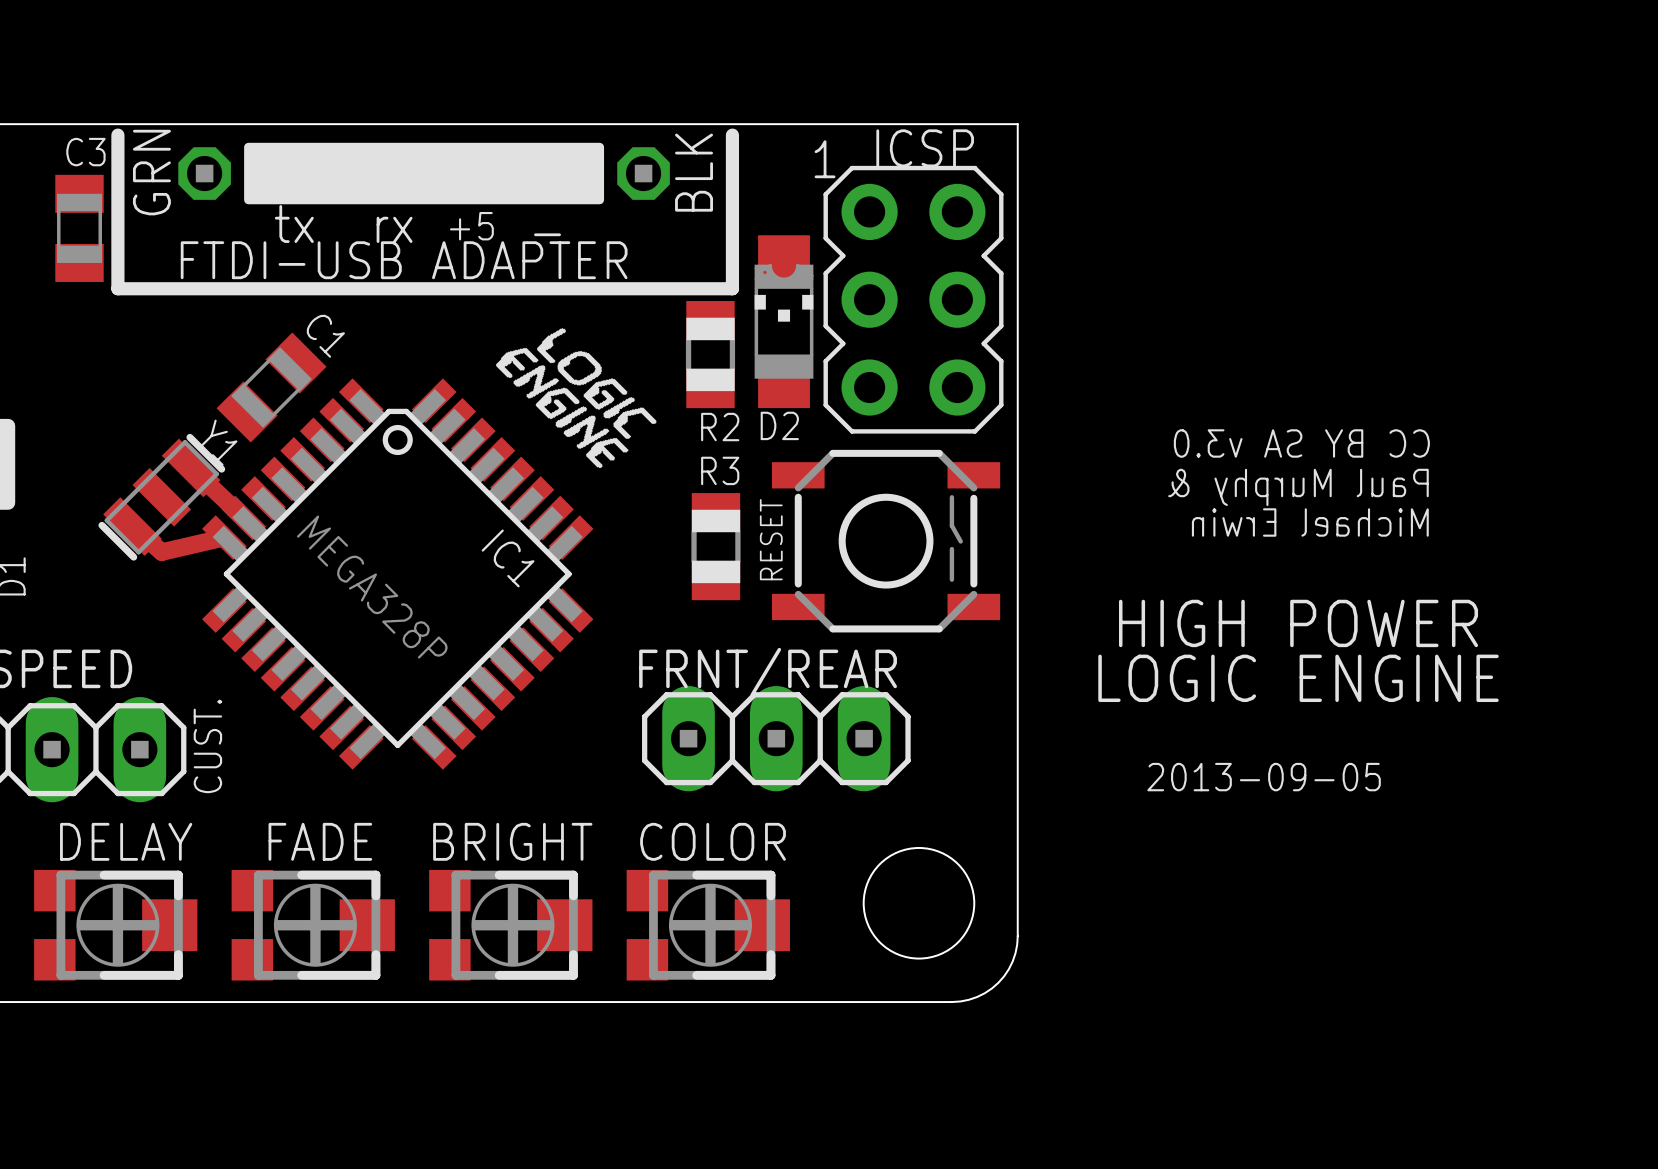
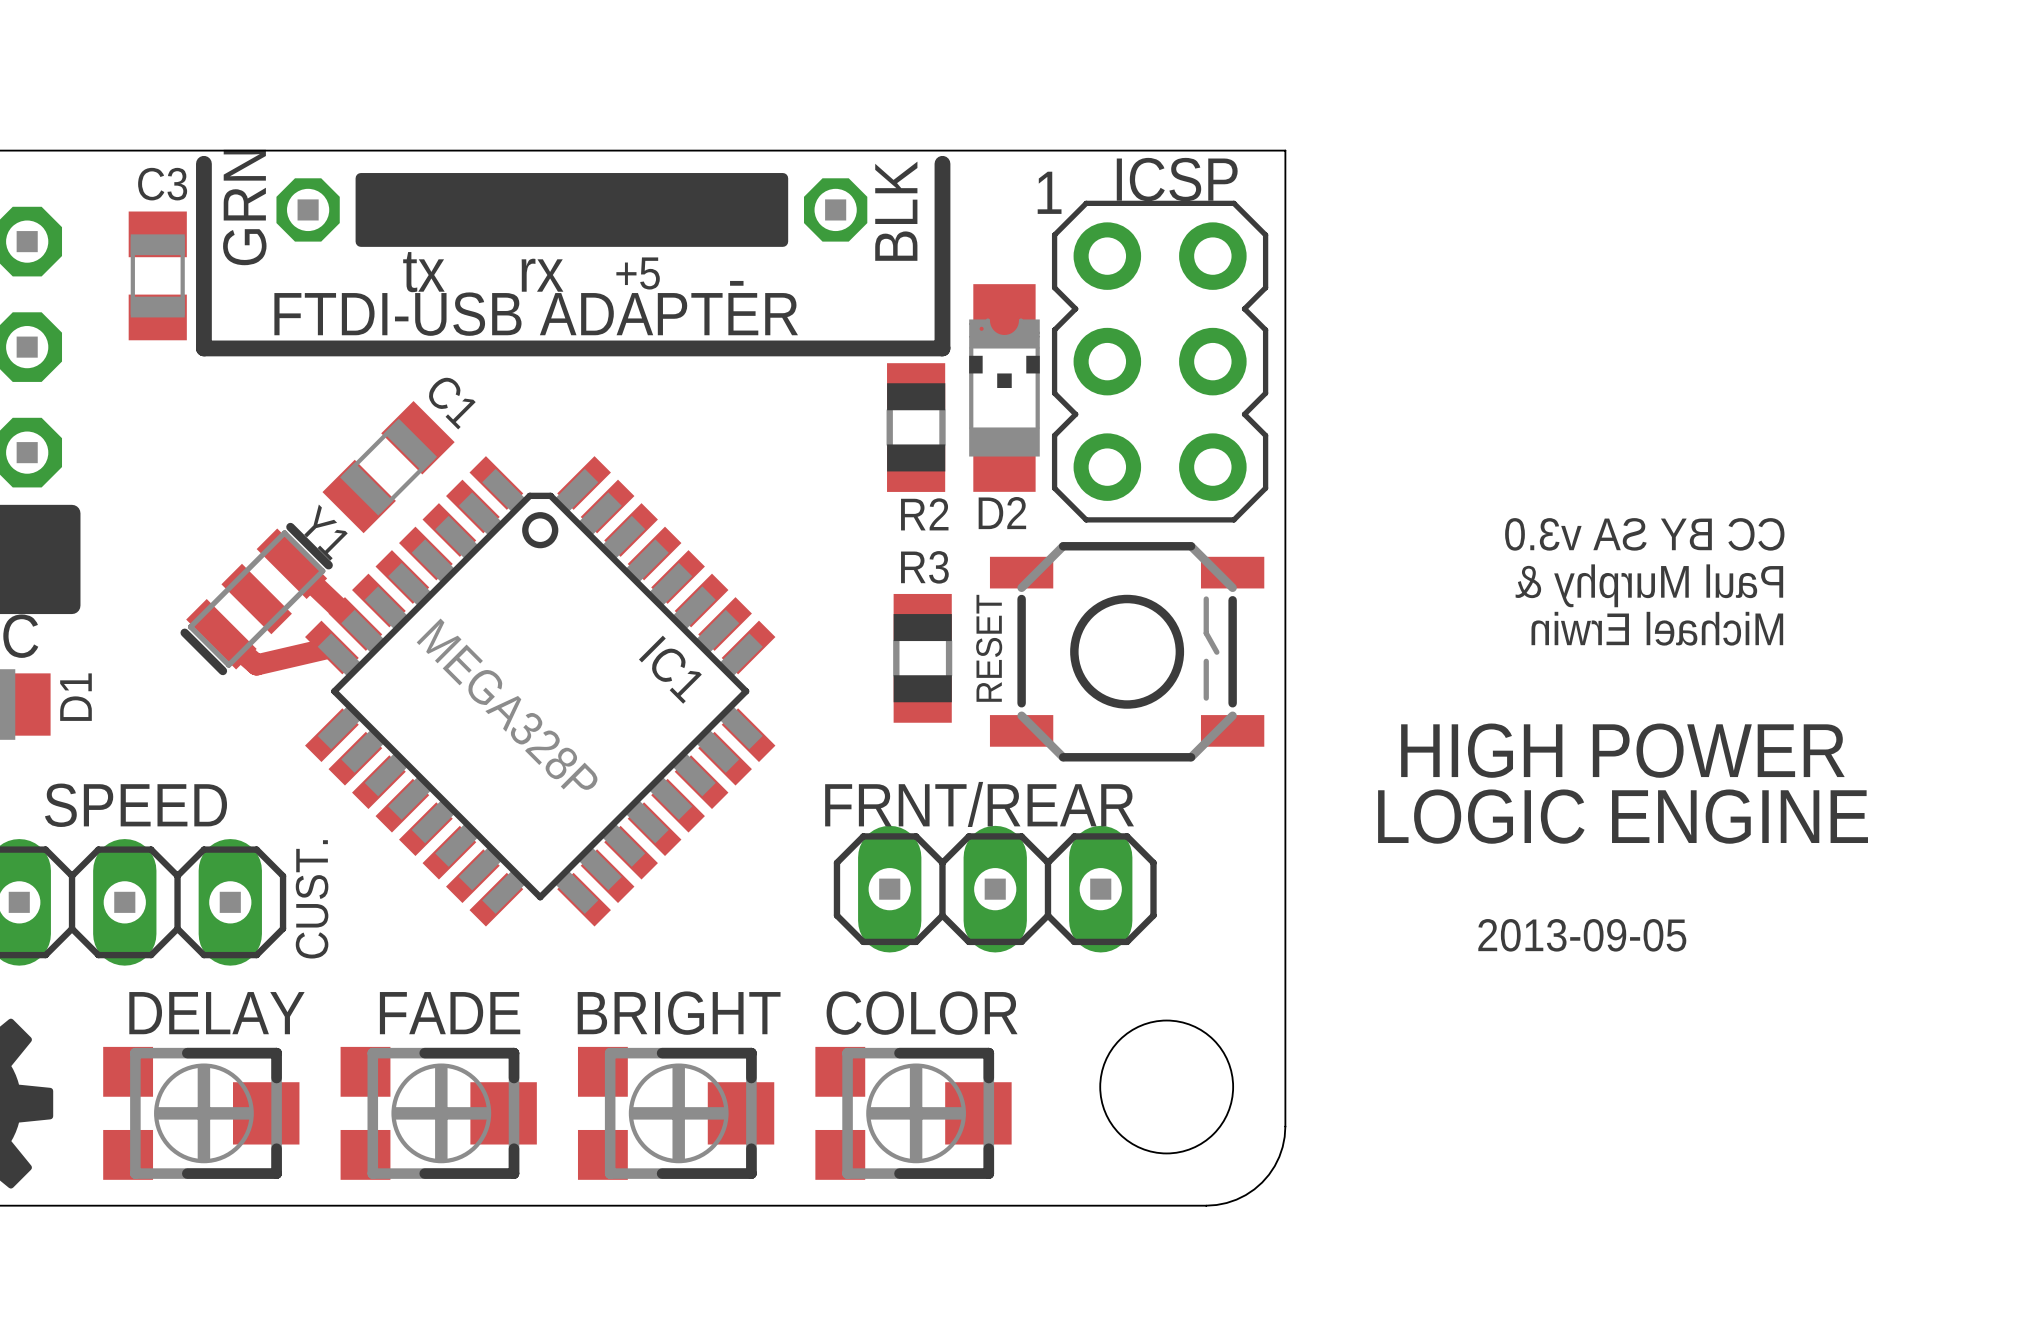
drawing: [495, 327, 657, 469] -> none

